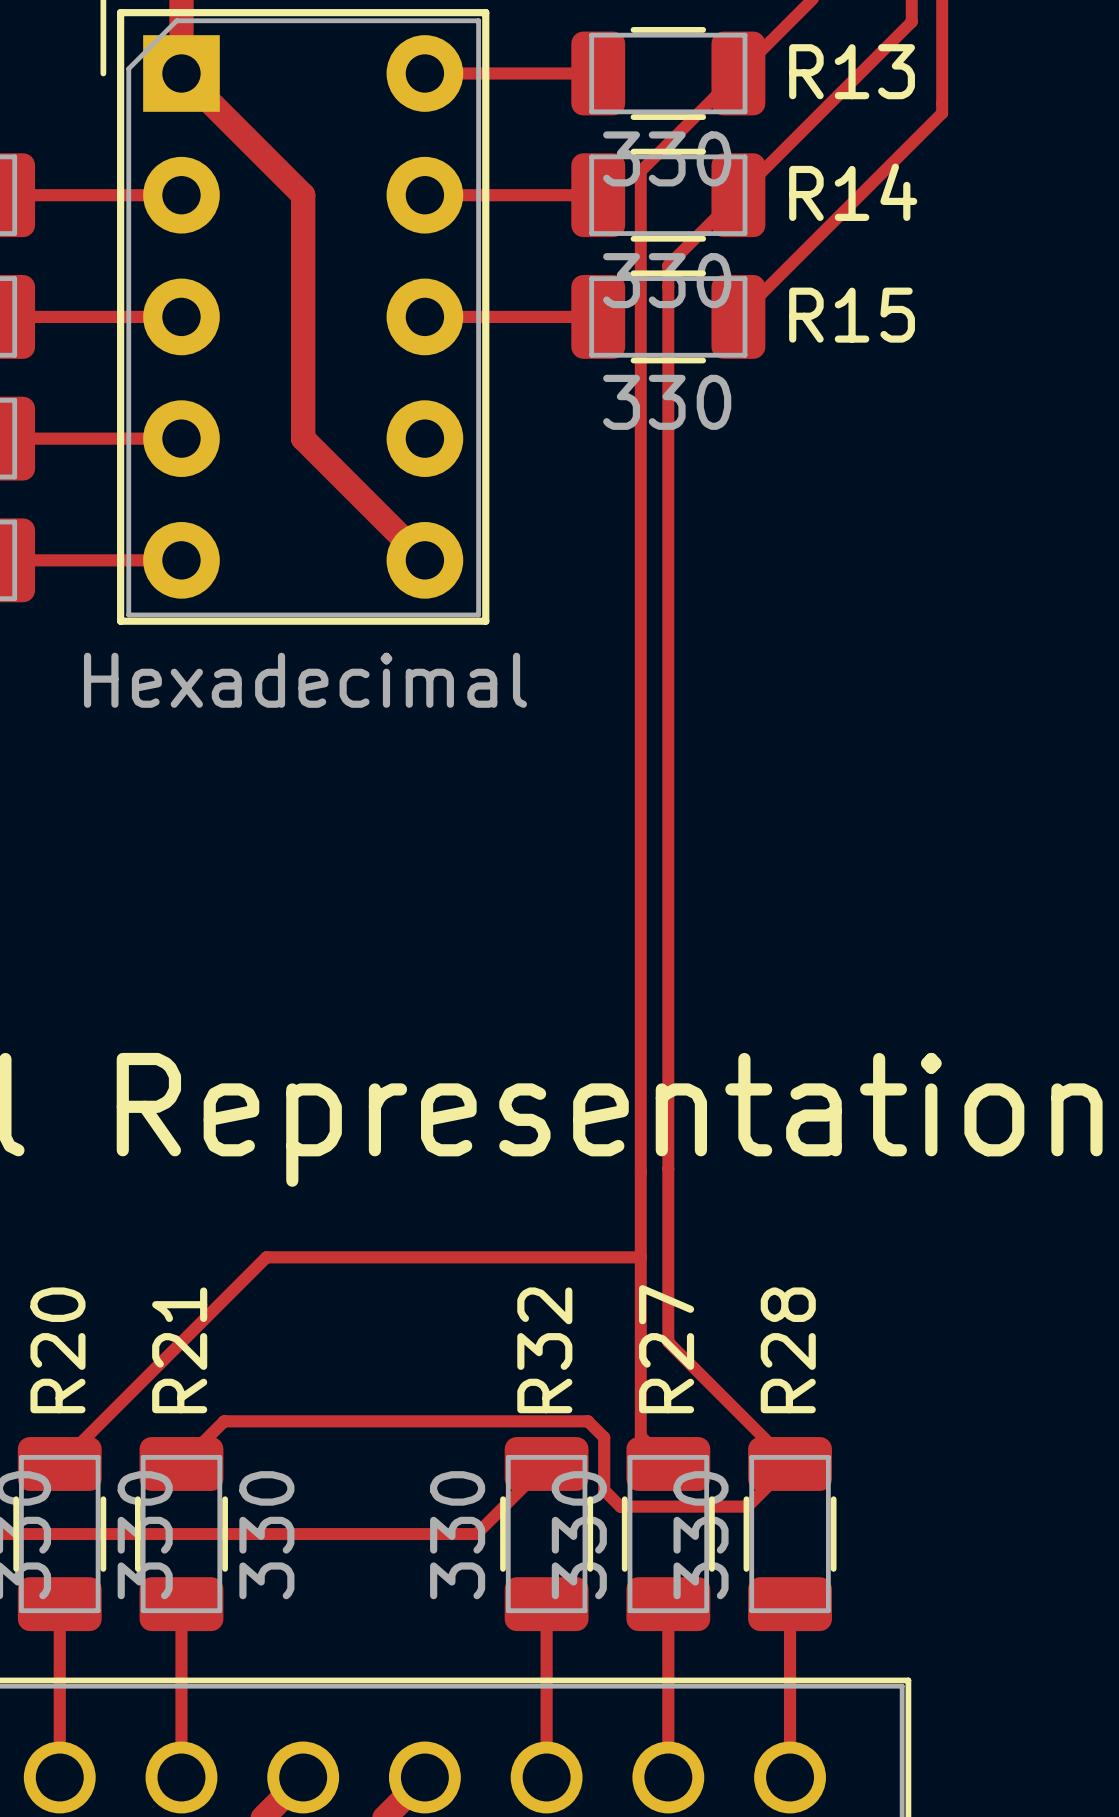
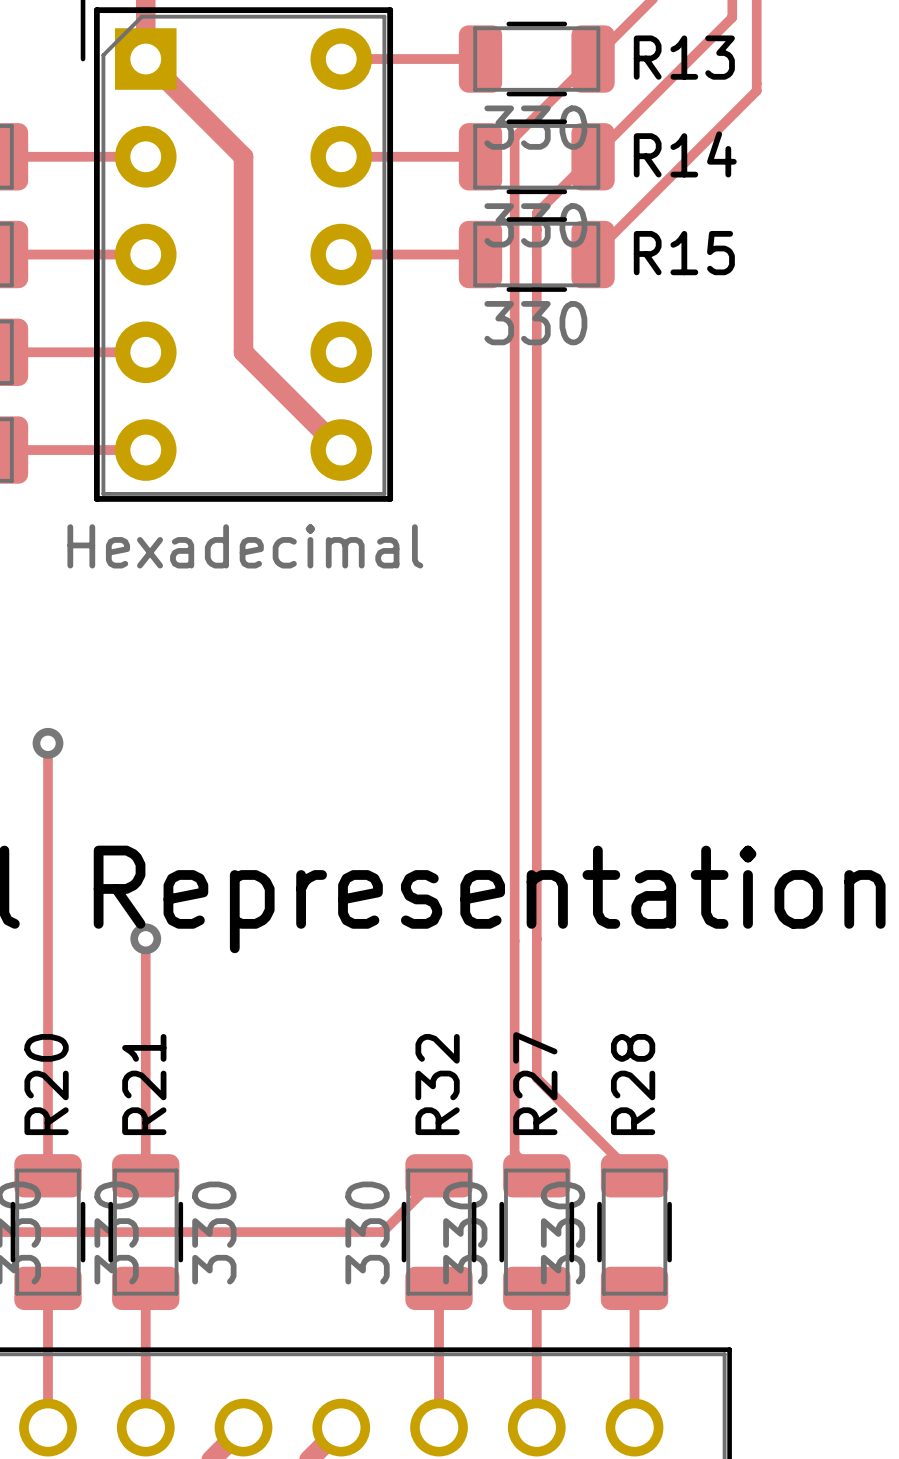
via: none -> (48, 743)
via: none -> (145, 938)
track: (640, 1257) (266, 1257) (59, 1463) -> (48, 743) (48, 1175)
track: (181, 1463) (224, 1421) (588, 1421) (604, 1437) (604, 1490) (620, 1506) (747, 1506) (790, 1463) -> (145, 1175) (145, 938)

